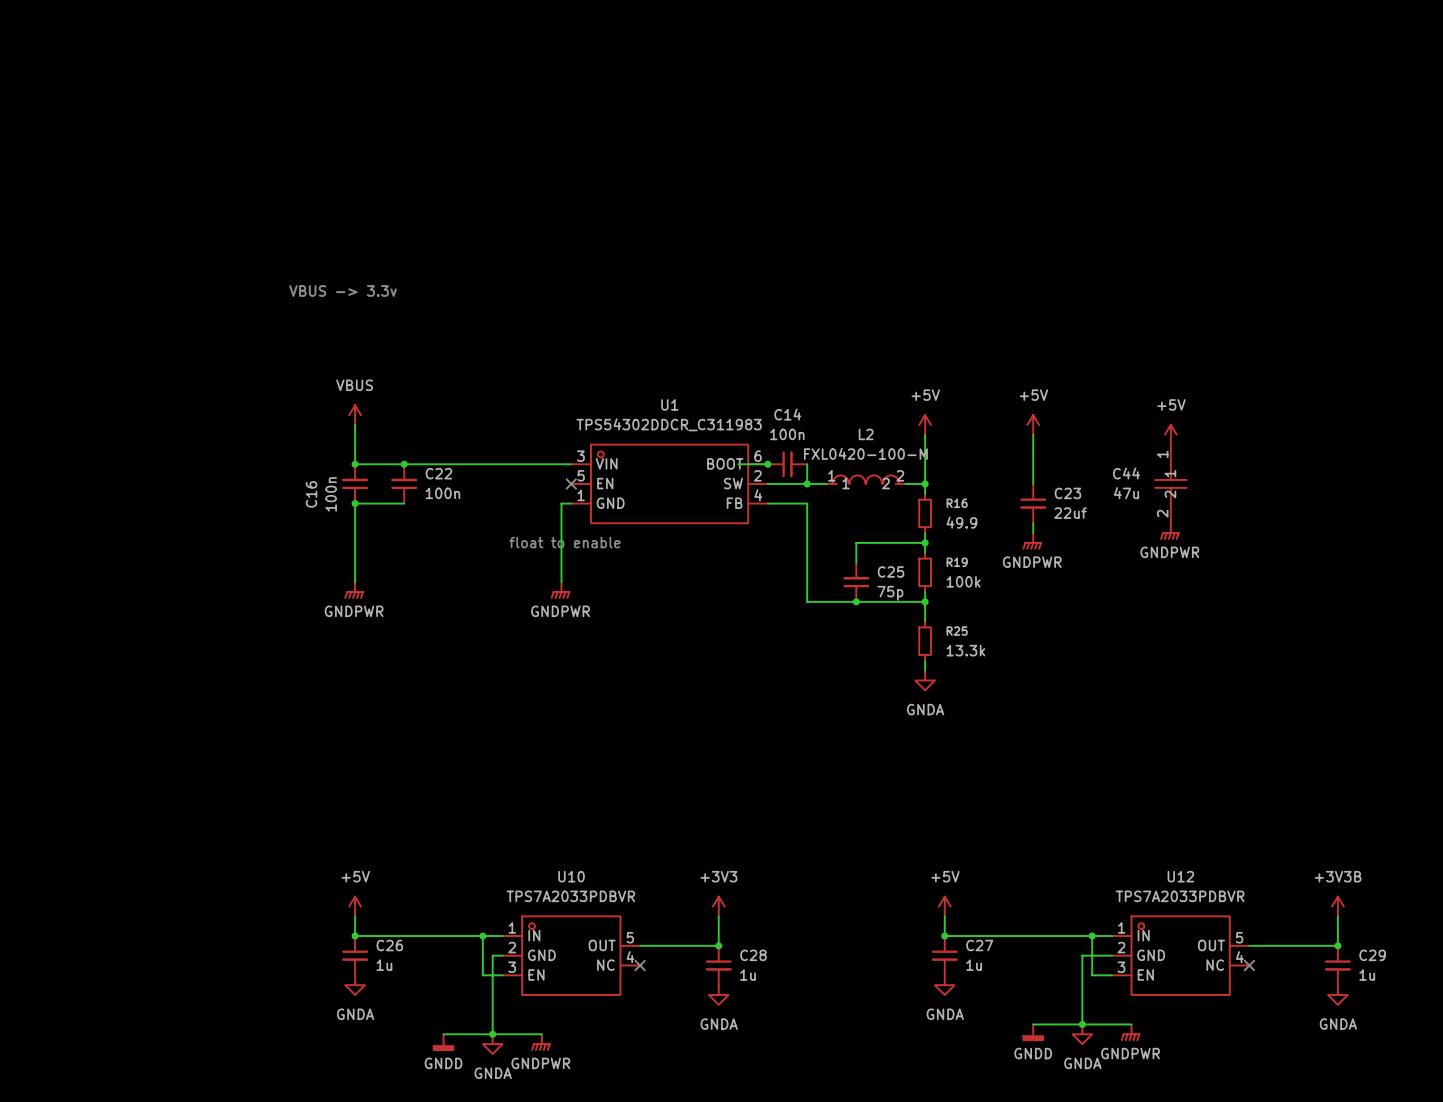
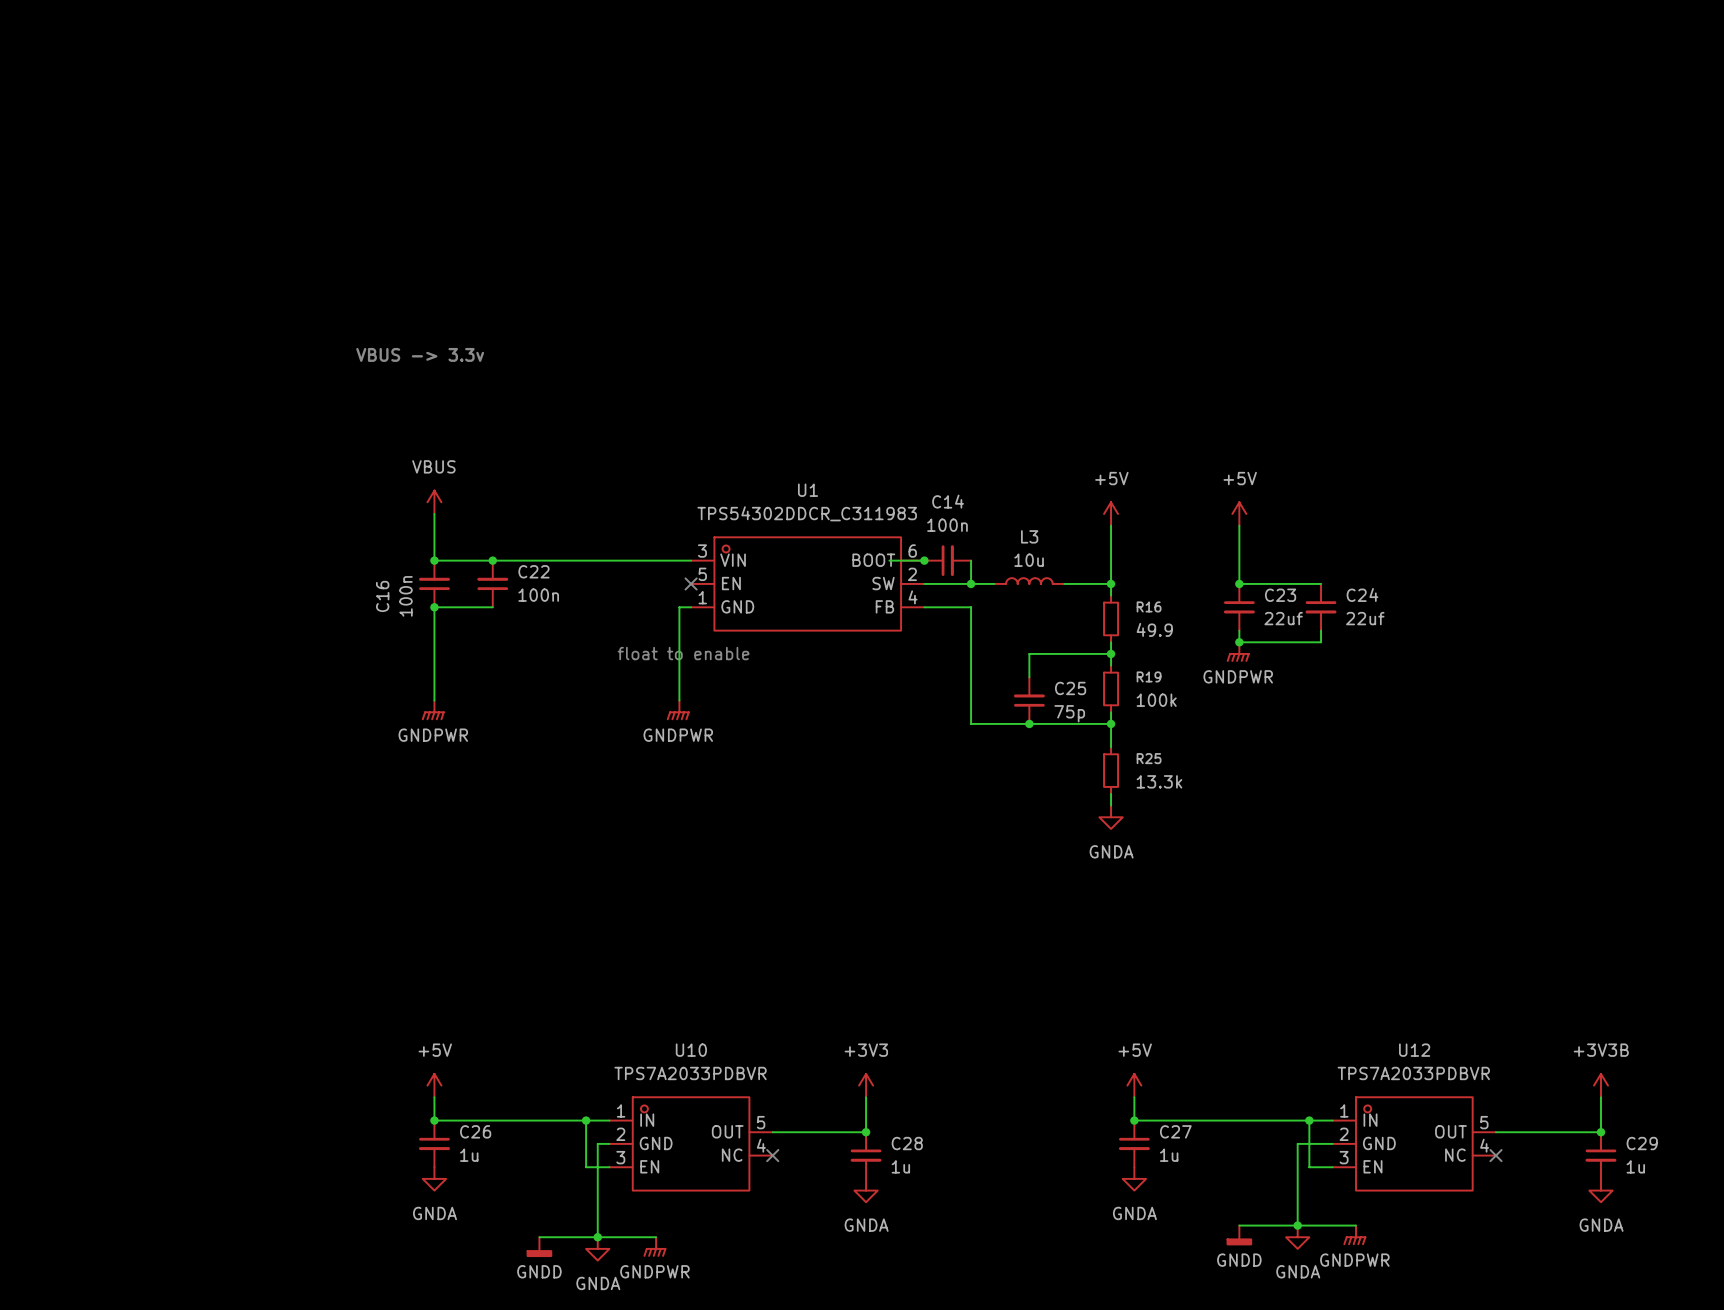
power symbol: +5V (1170, 434) -> none
L2: FXL0420-100-M (866, 479) -> none
L3: none -> 10u (1029, 581)
wire: none -> (1239, 583) (1321, 583)
junction: none -> (1239, 583)
C44: 47u (1170, 483) -> none
C24: none -> 22uf (1321, 607)
wire: none -> (1321, 630) (1321, 642) (1239, 642)
power symbol: GNDPWR (1169, 531) -> none
junction: none -> (1239, 642)

